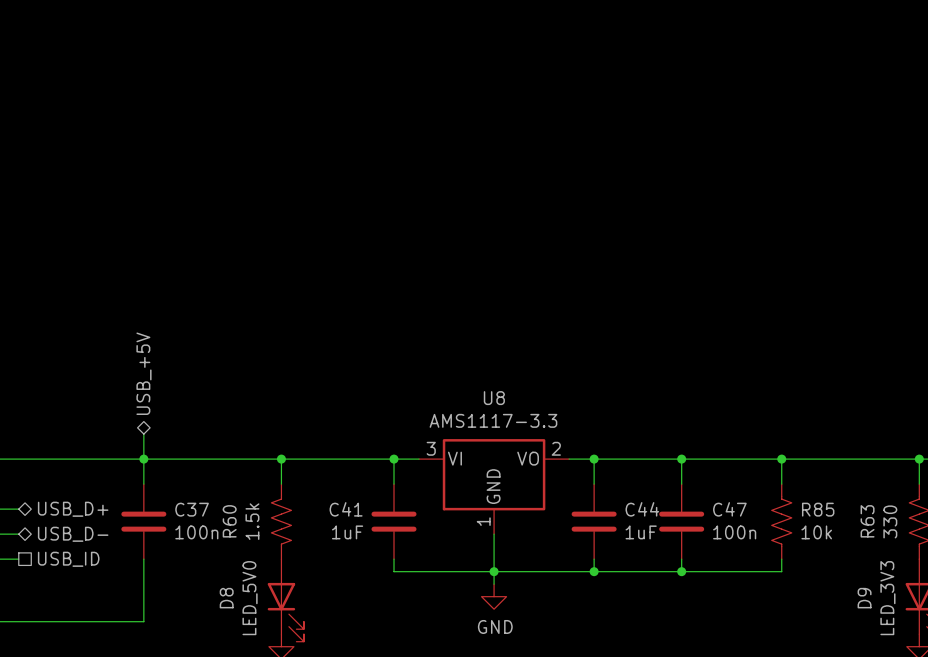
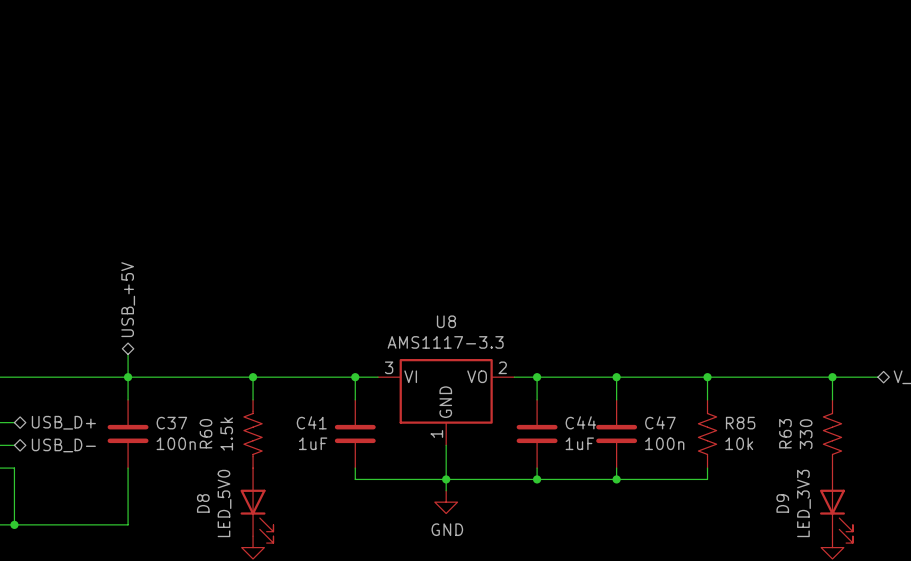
wire: none -> (14, 468) (14, 524)
hierarchical label: USB_ID (68, 559) -> none
junction: none -> (14, 524)

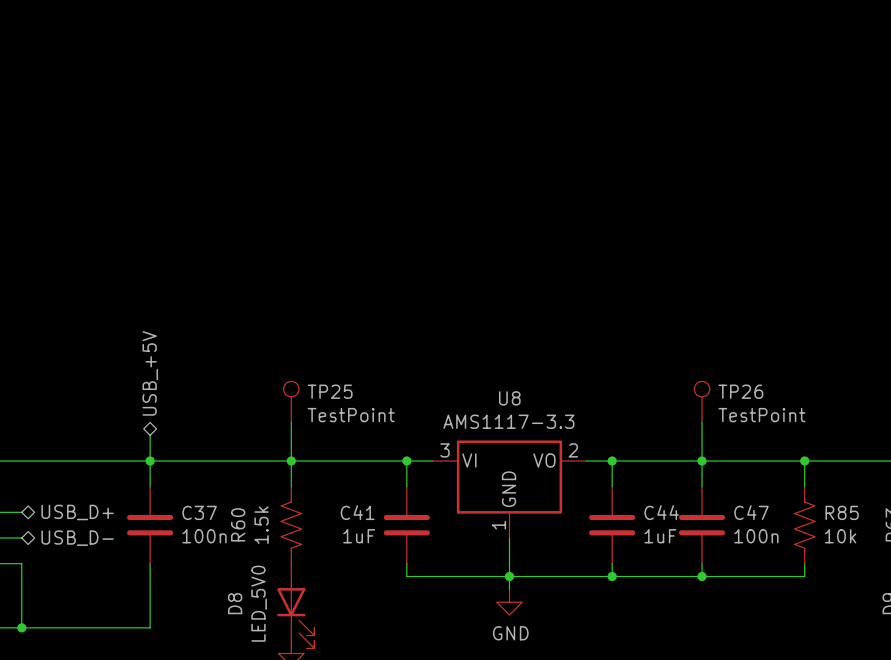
TP25: none -> TestPoint (291, 401)
TP26: none -> TestPoint (702, 401)
wire: none -> (291, 422) (291, 461)
wire: none -> (702, 422) (702, 461)

